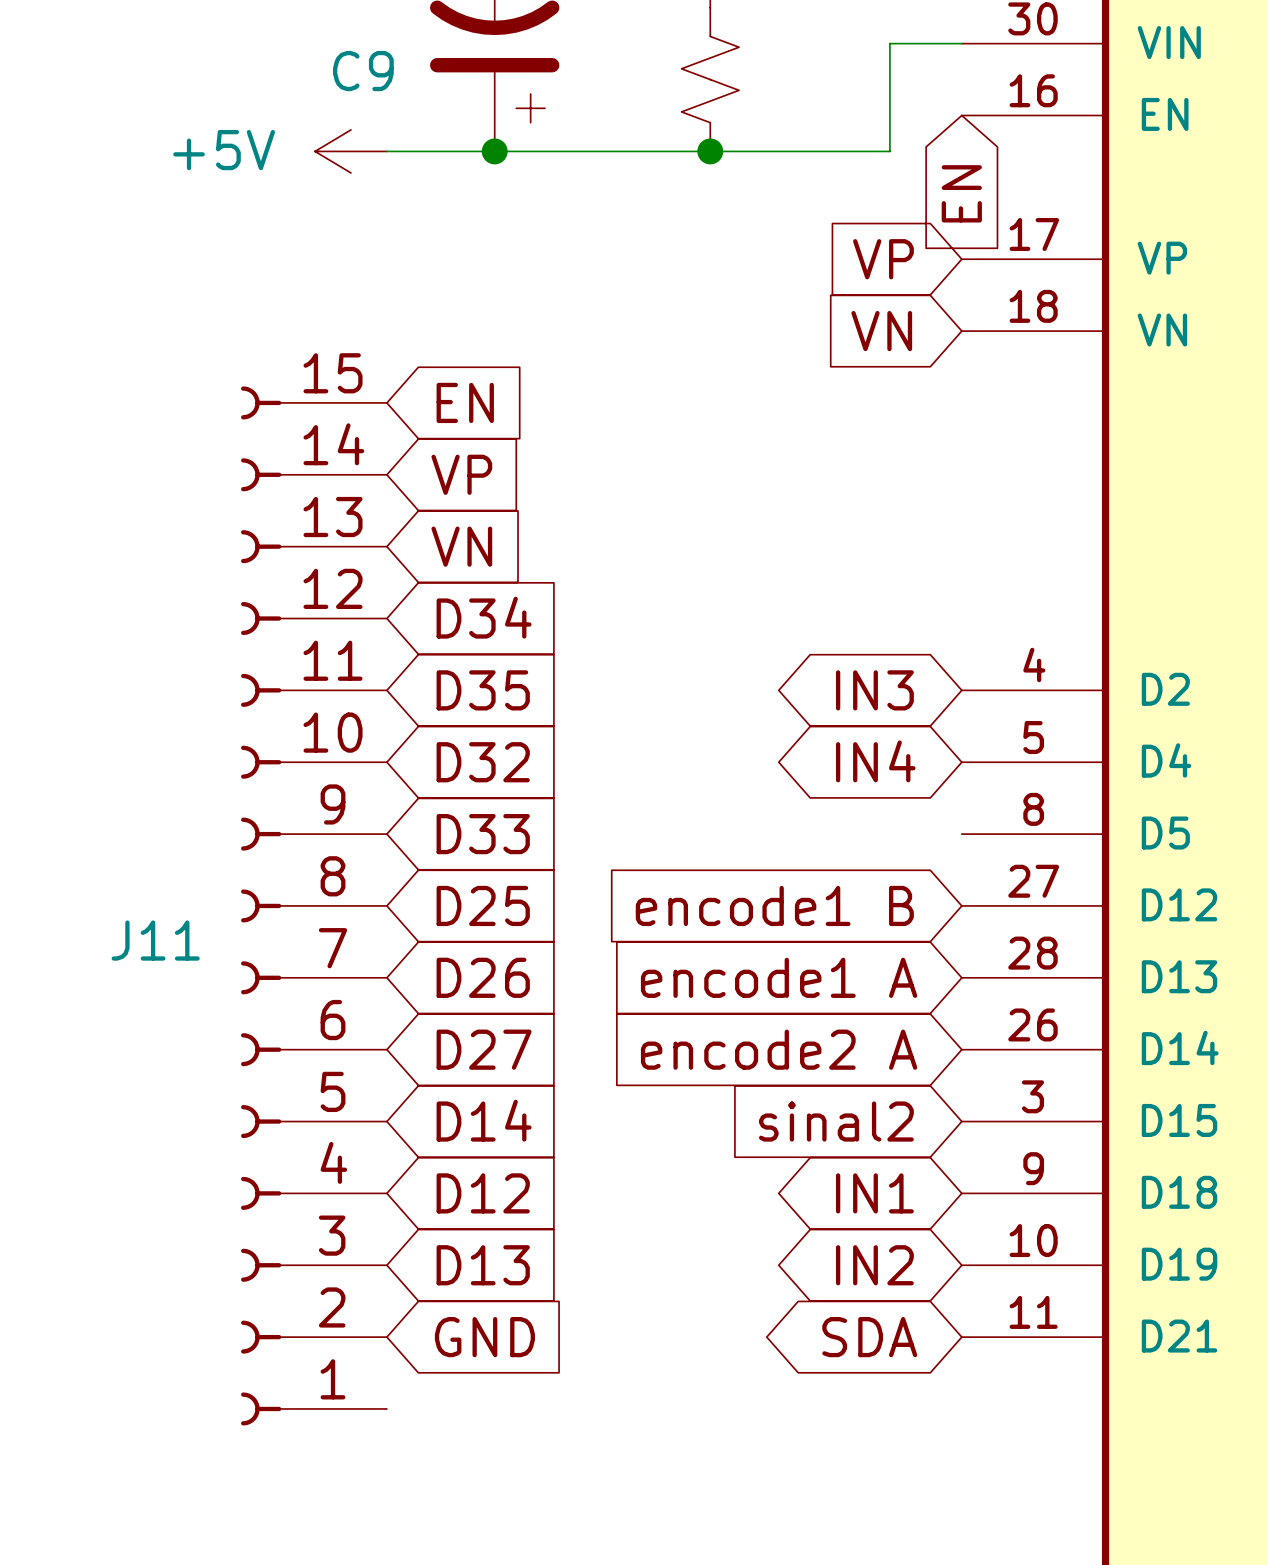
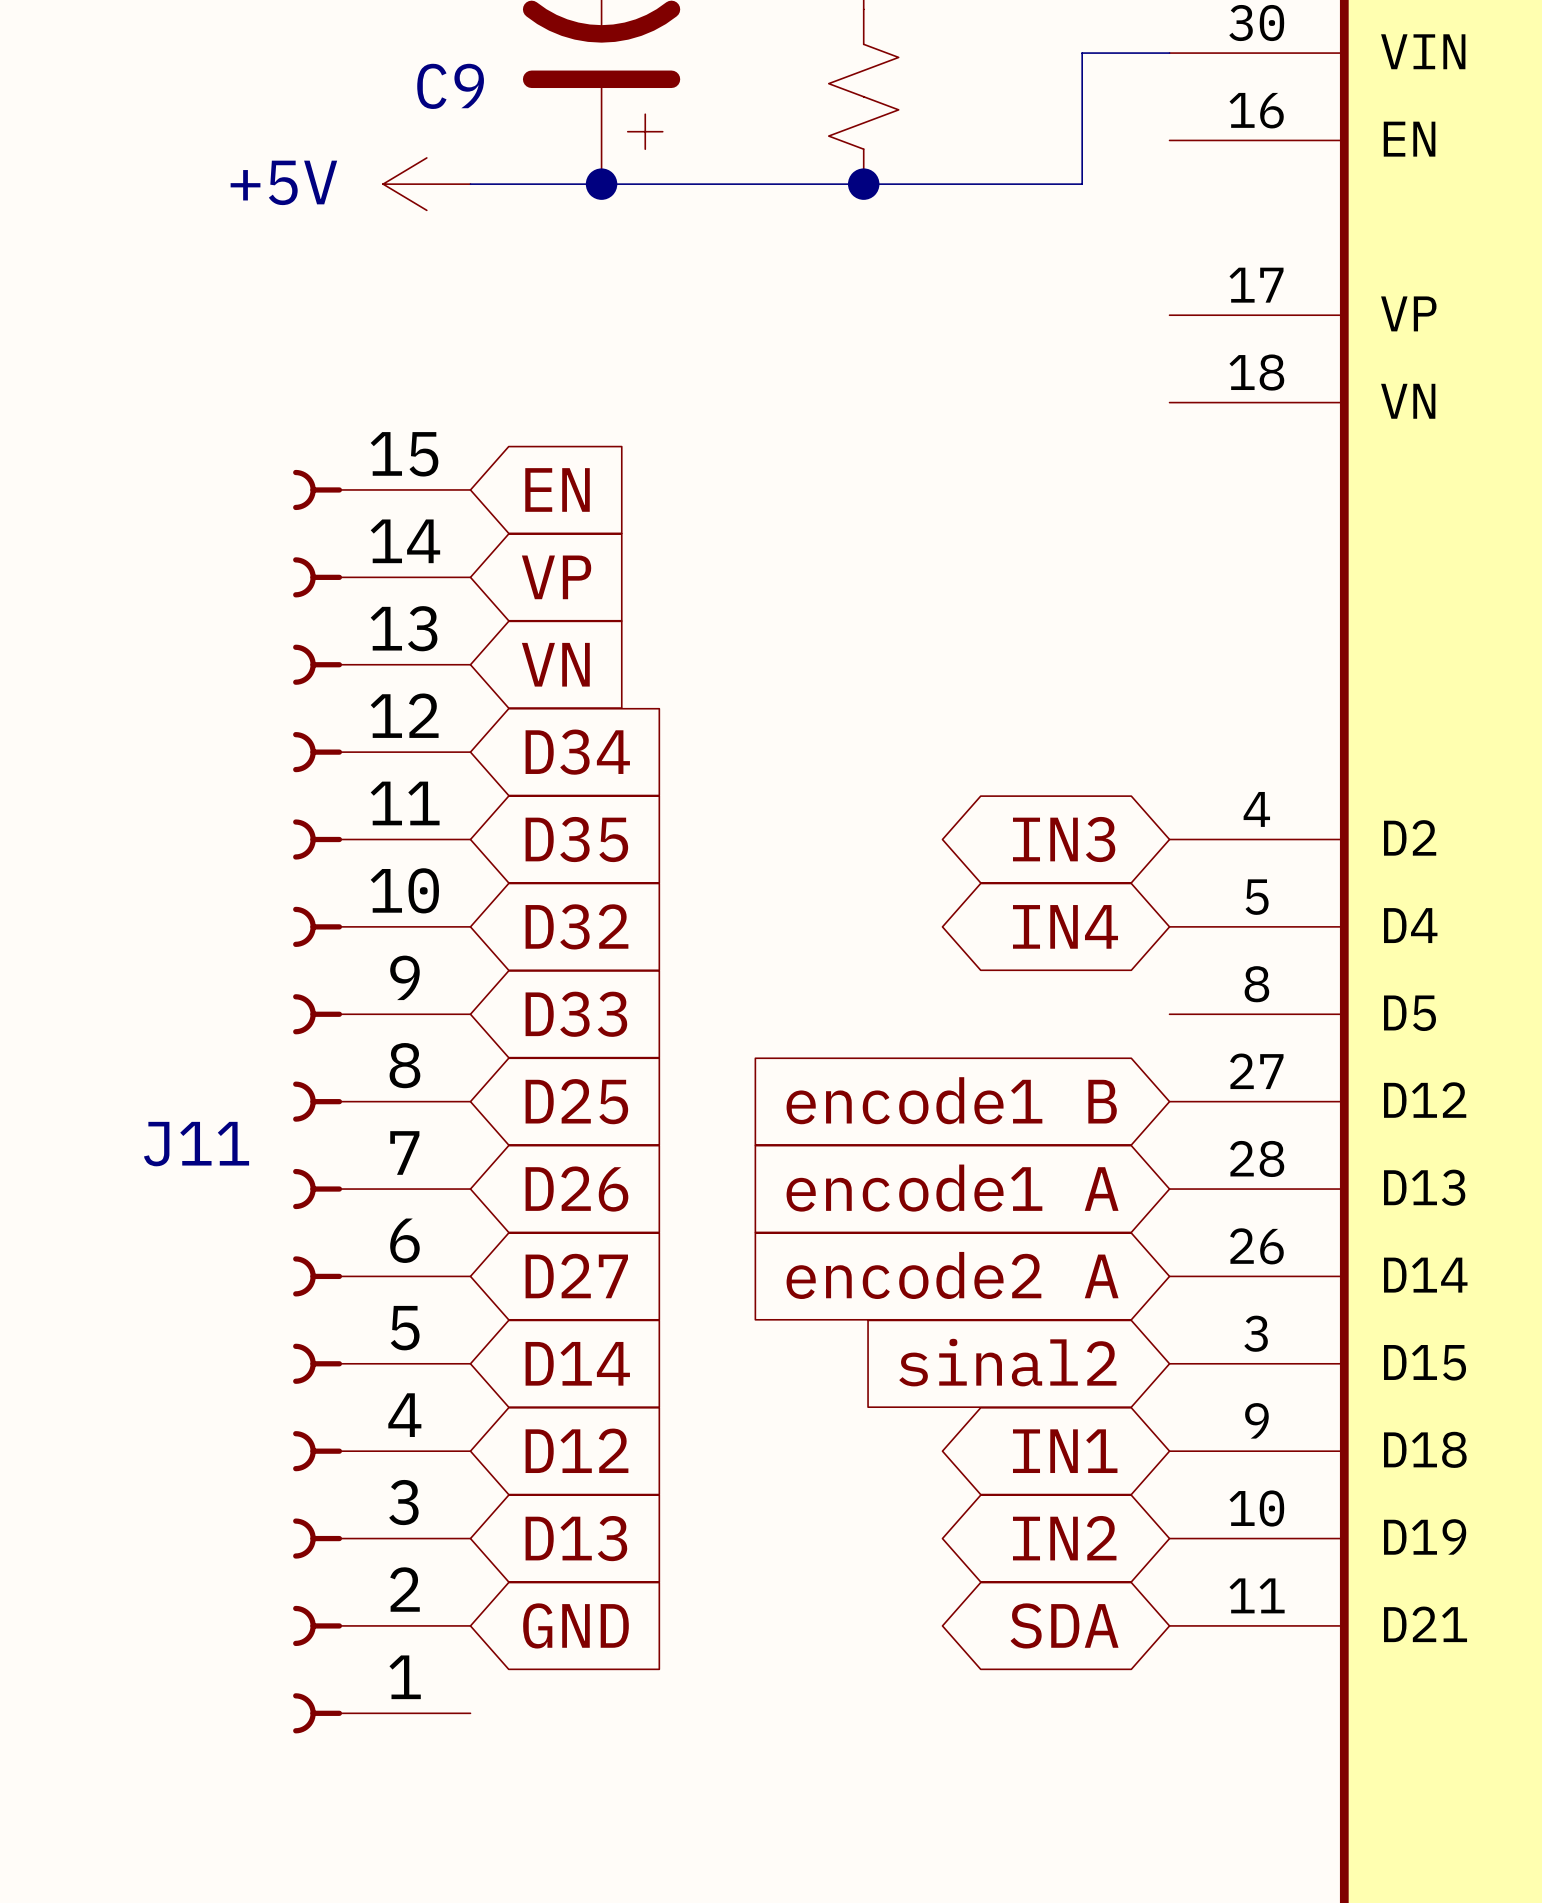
global label: EN (961, 193) -> none
global label: VP (883, 259) -> none
global label: VN (881, 331) -> none

